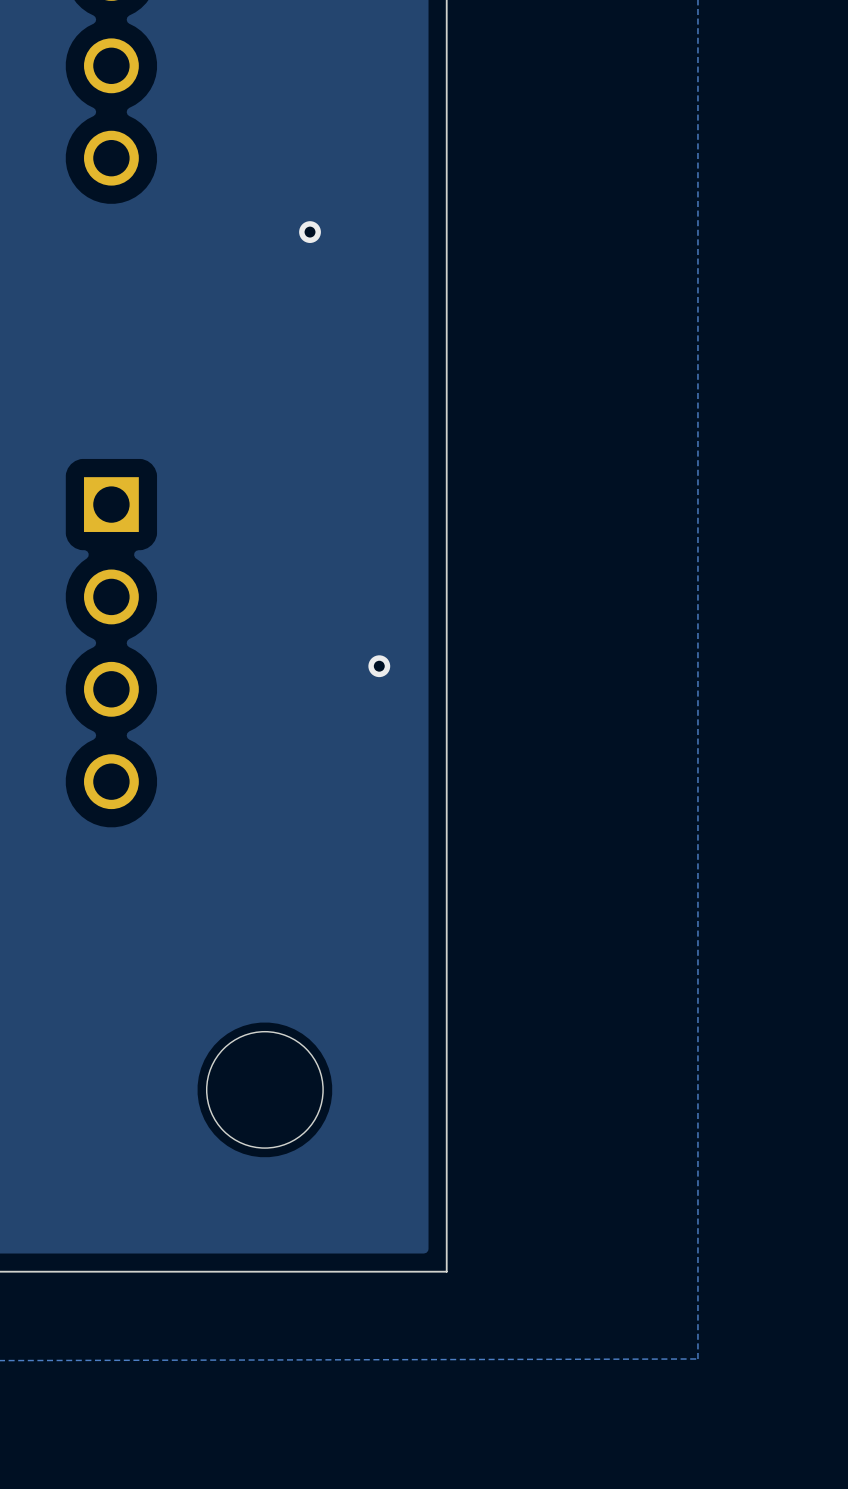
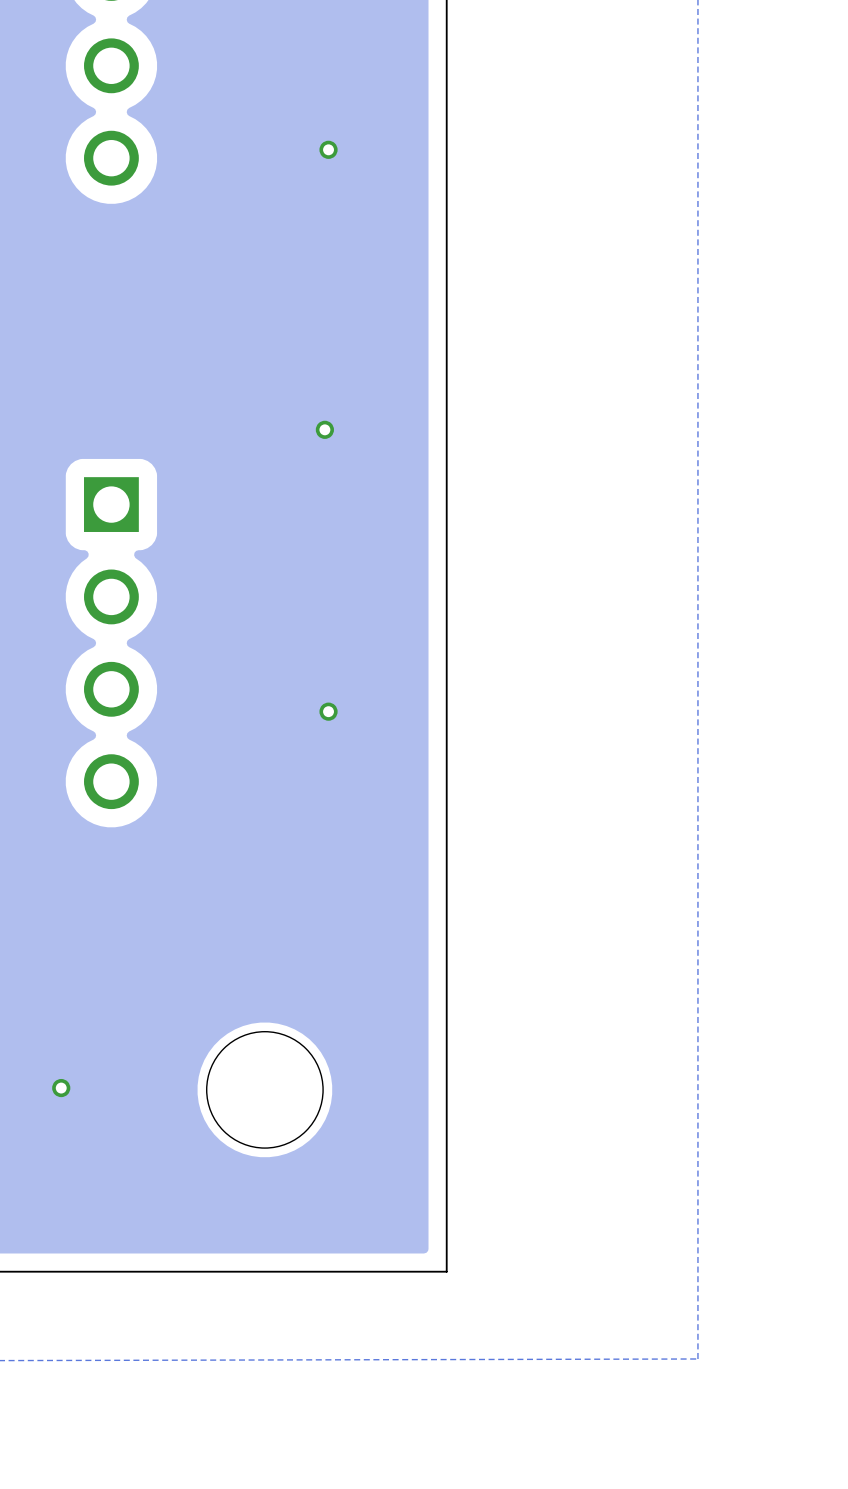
via: none -> (328, 149)
via: (310, 232) -> none
via: none -> (324, 429)
via: (379, 666) -> none
via: none -> (328, 711)
via: none -> (61, 1088)

